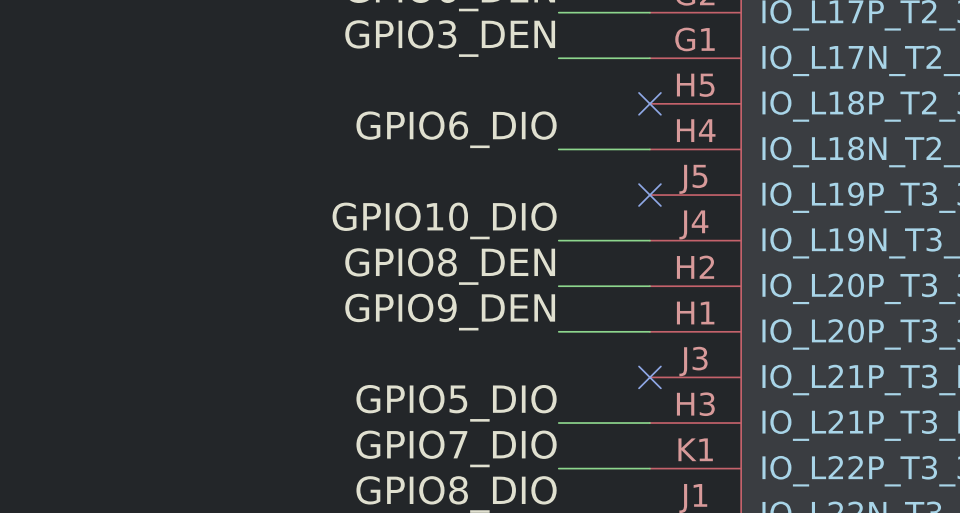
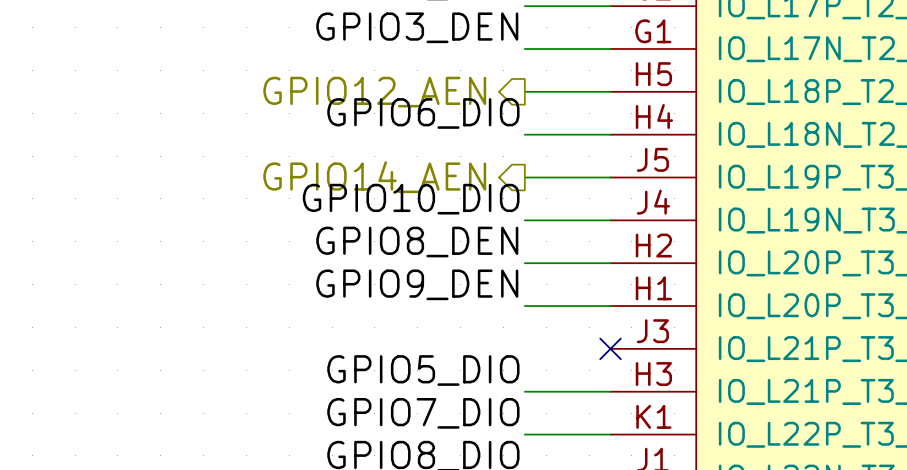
wire: none -> (524, 91) (610, 91)
no-connect mark: (649, 103) -> none
hierarchical label: none -> GPIO12_AEN (374, 92)
wire: none -> (524, 177) (610, 177)
no-connect mark: (649, 195) -> none
hierarchical label: none -> GPIO14_AEN (374, 177)

